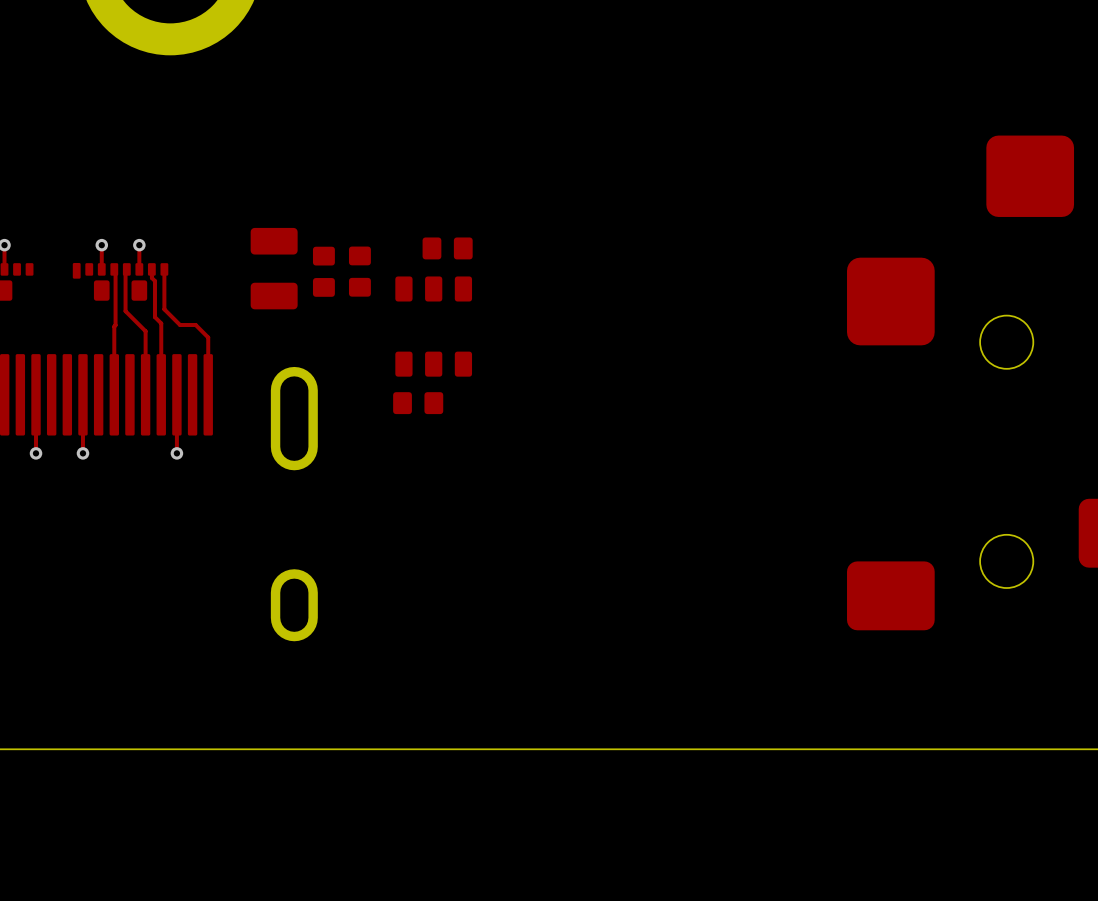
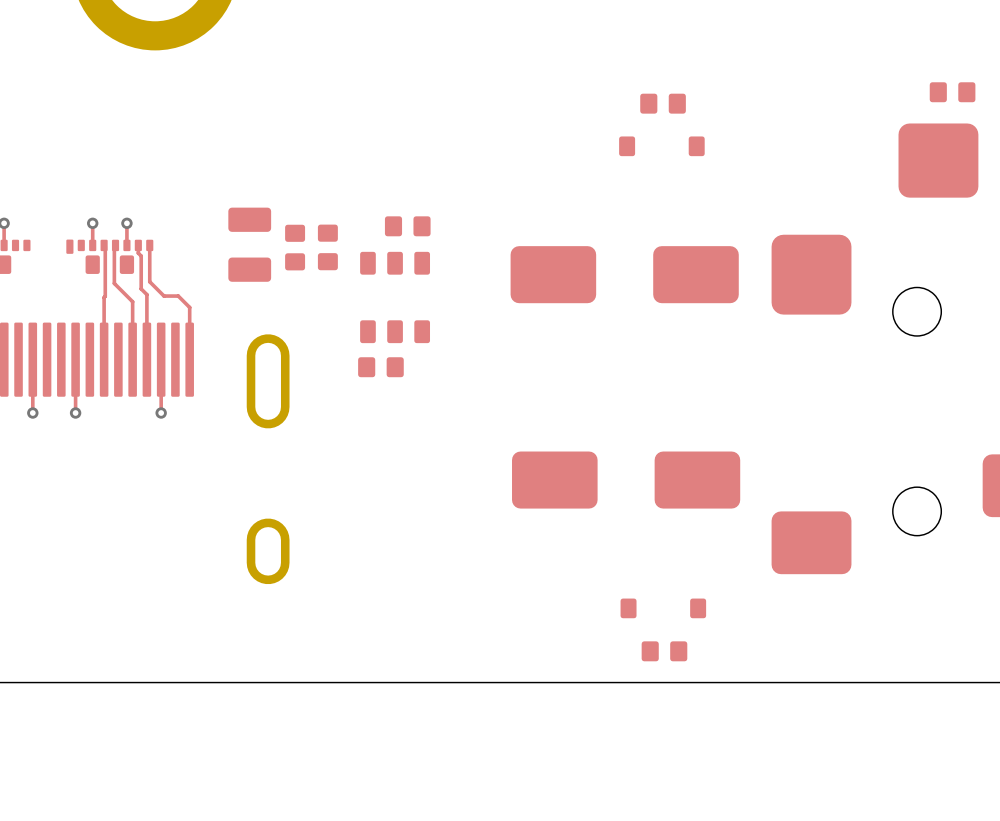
part: none -> (952, 92)
part: none -> (663, 103)
part: none -> (661, 146)
part: none -> (624, 274)
part: none -> (626, 480)
part: none -> (663, 608)
part: none -> (664, 651)

